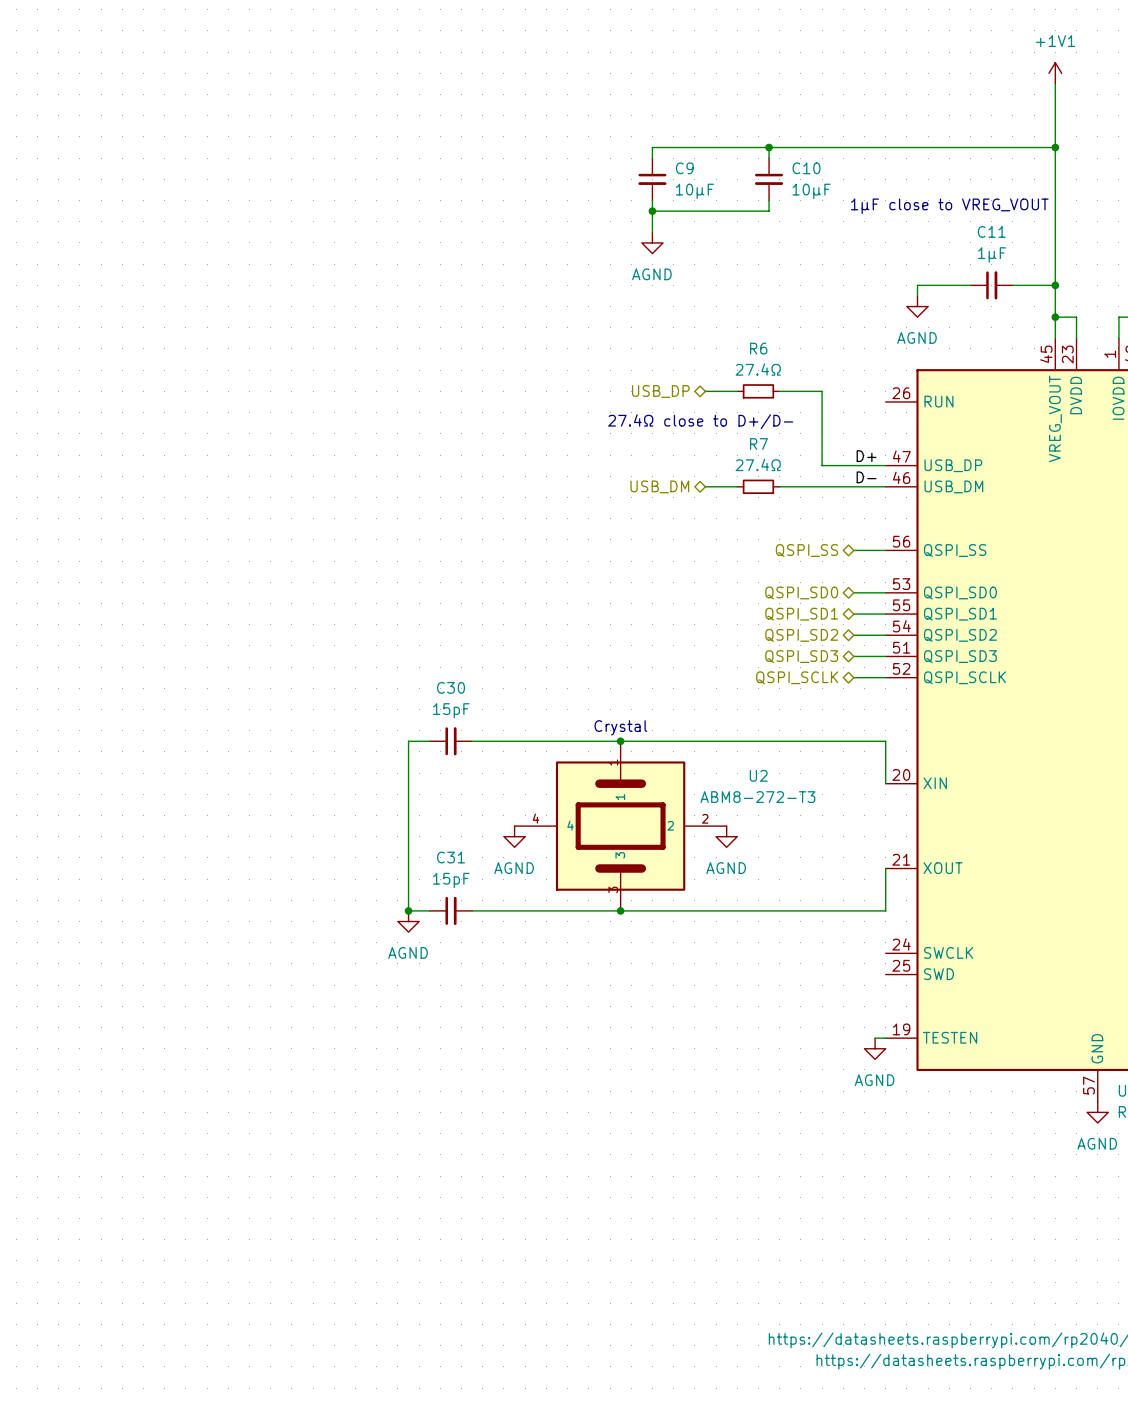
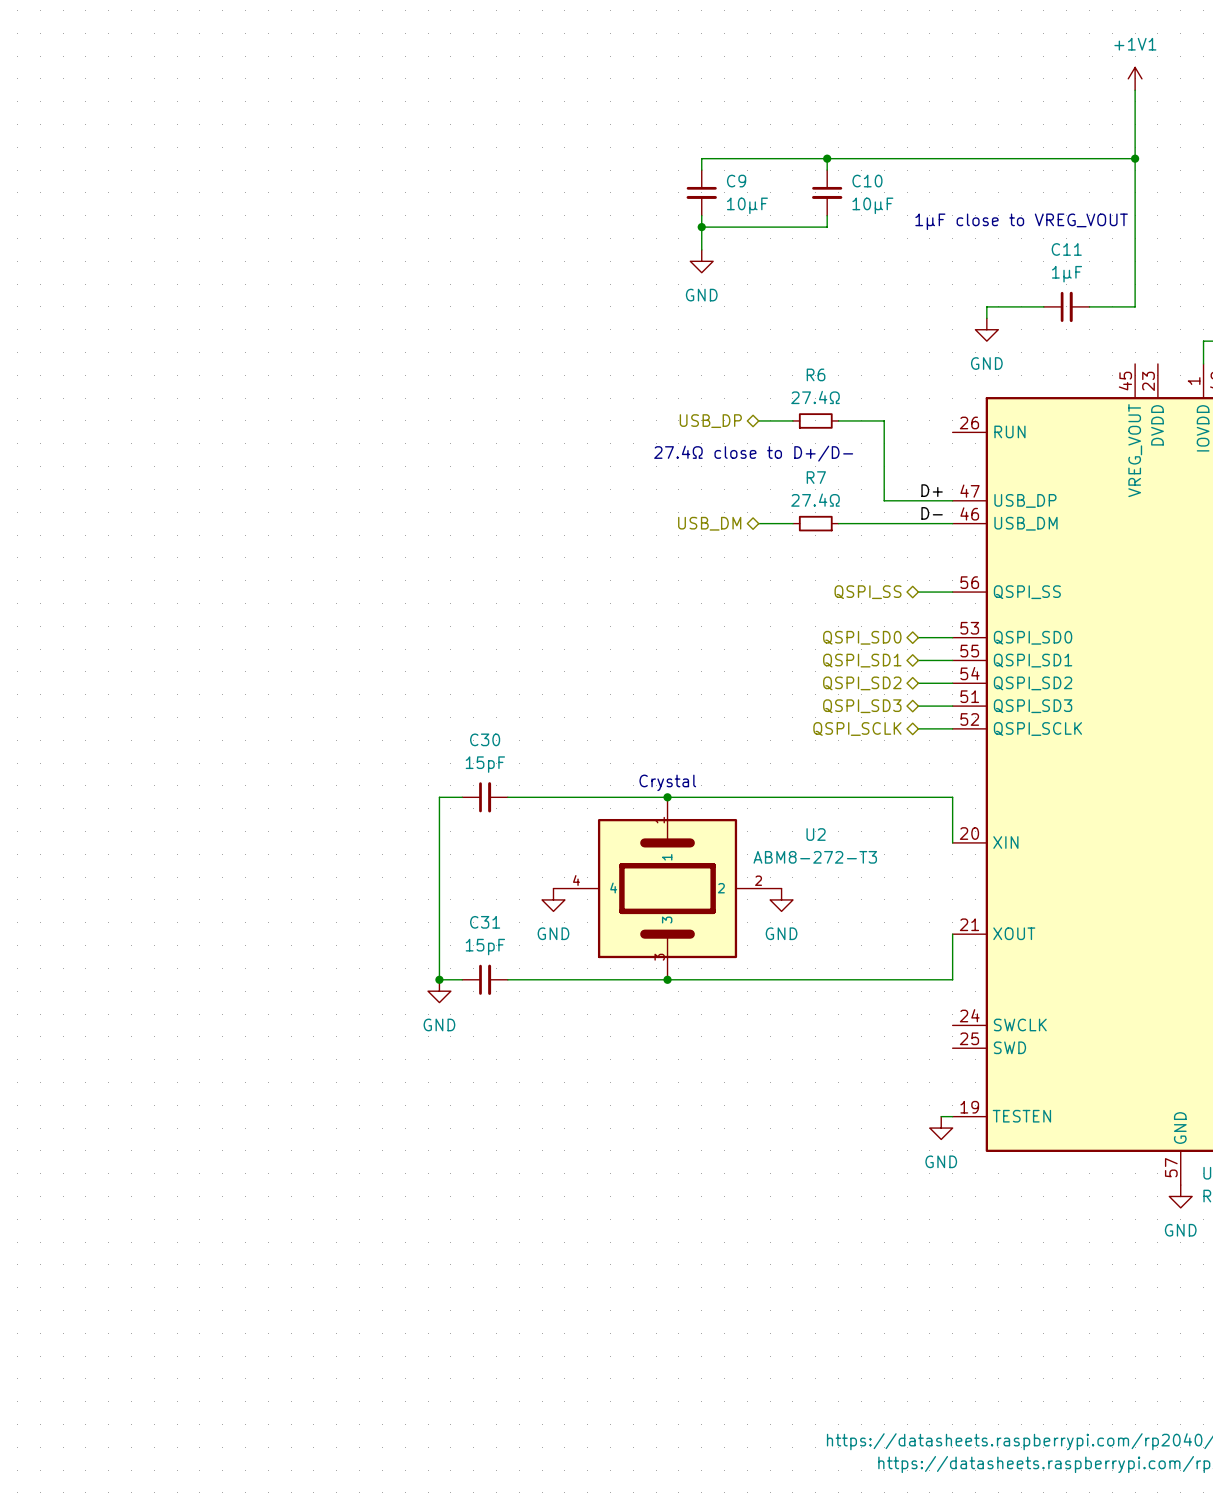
power symbol: AGND (652, 242) -> GND (701, 261)
wire: (1055, 285) (1055, 338) -> none
junction: (1055, 285) -> none
power symbol: AGND (917, 306) -> GND (986, 329)
wire: (1055, 317) (1076, 317) (1076, 338) -> none
junction: (1055, 317) -> none
power symbol: AGND (514, 836) -> GND (553, 899)
power symbol: AGND (726, 836) -> GND (781, 899)
power symbol: AGND (408, 921) -> GND (439, 991)
power symbol: AGND (875, 1048) -> GND (941, 1128)
power symbol: AGND (1097, 1112) -> GND (1180, 1196)

